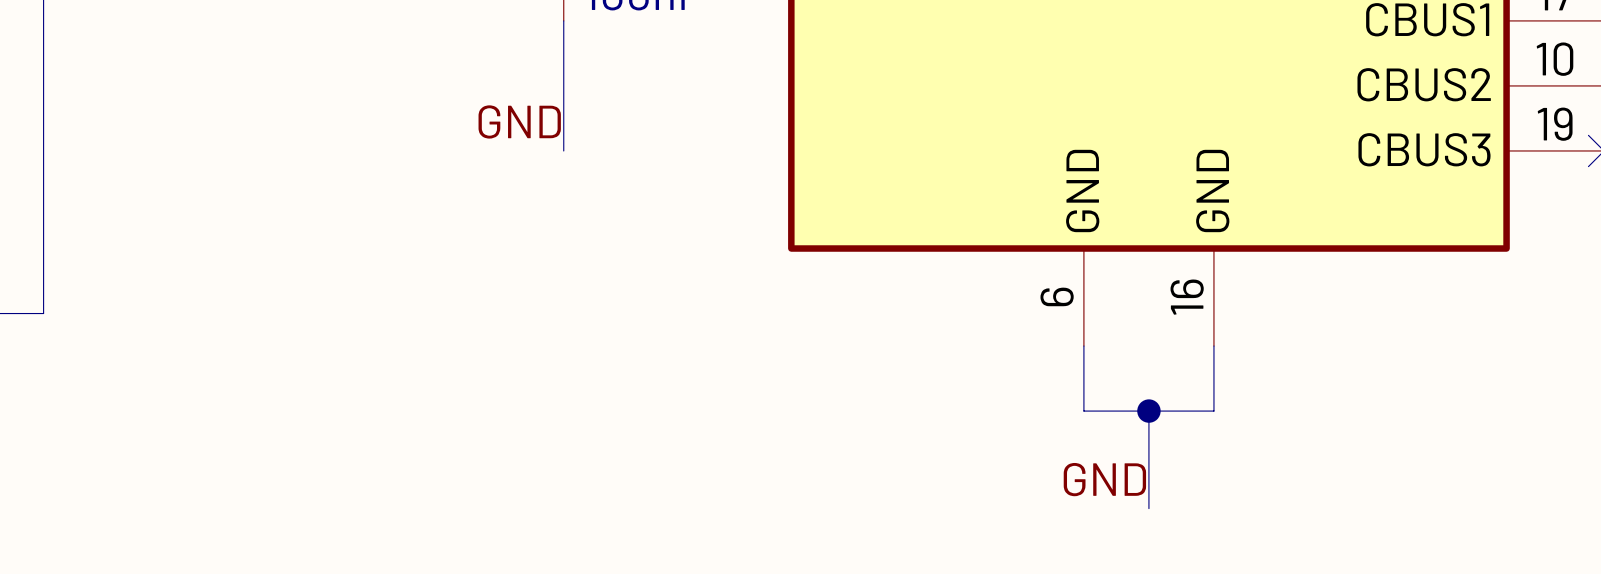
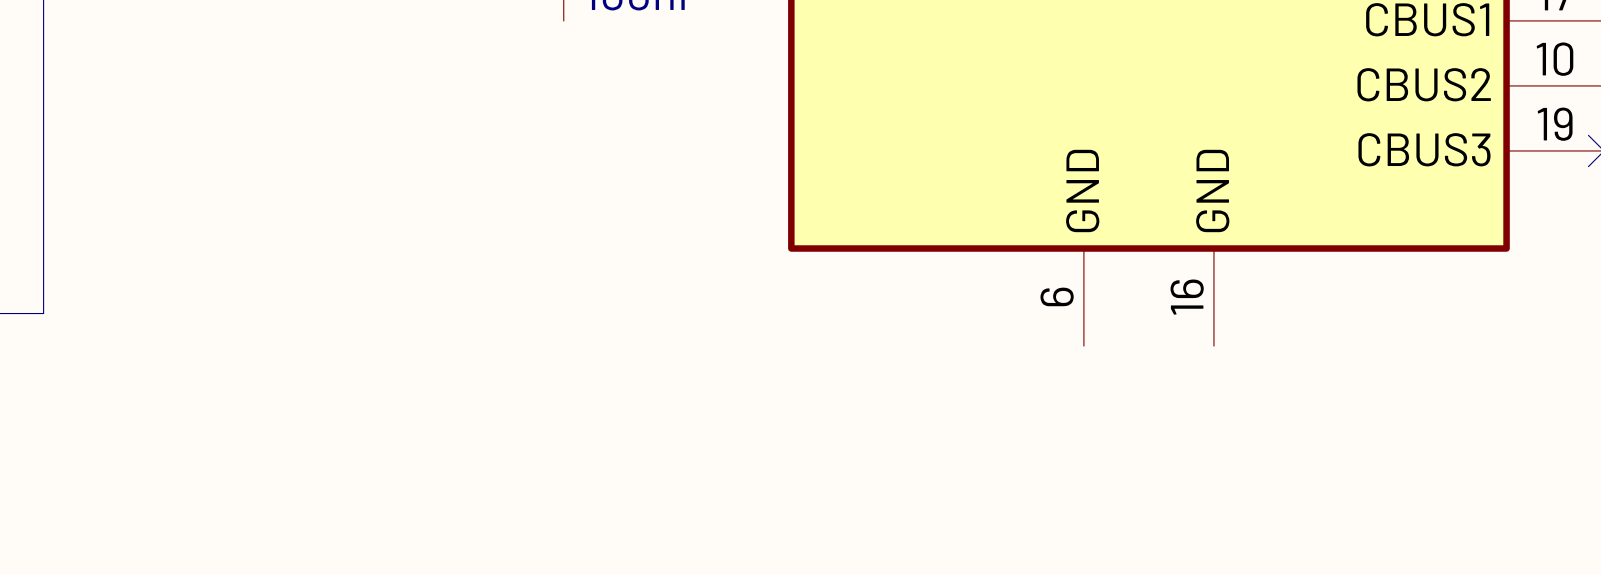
wire: (563, 20) (563, 150) -> none
label: GND (519, 121) -> none
wire: (1083, 346) (1083, 411) (1213, 411) (1213, 346) -> none
wire: (1148, 411) (1148, 508) -> none
junction: (1148, 411) -> none
label: GND (1104, 479) -> none

